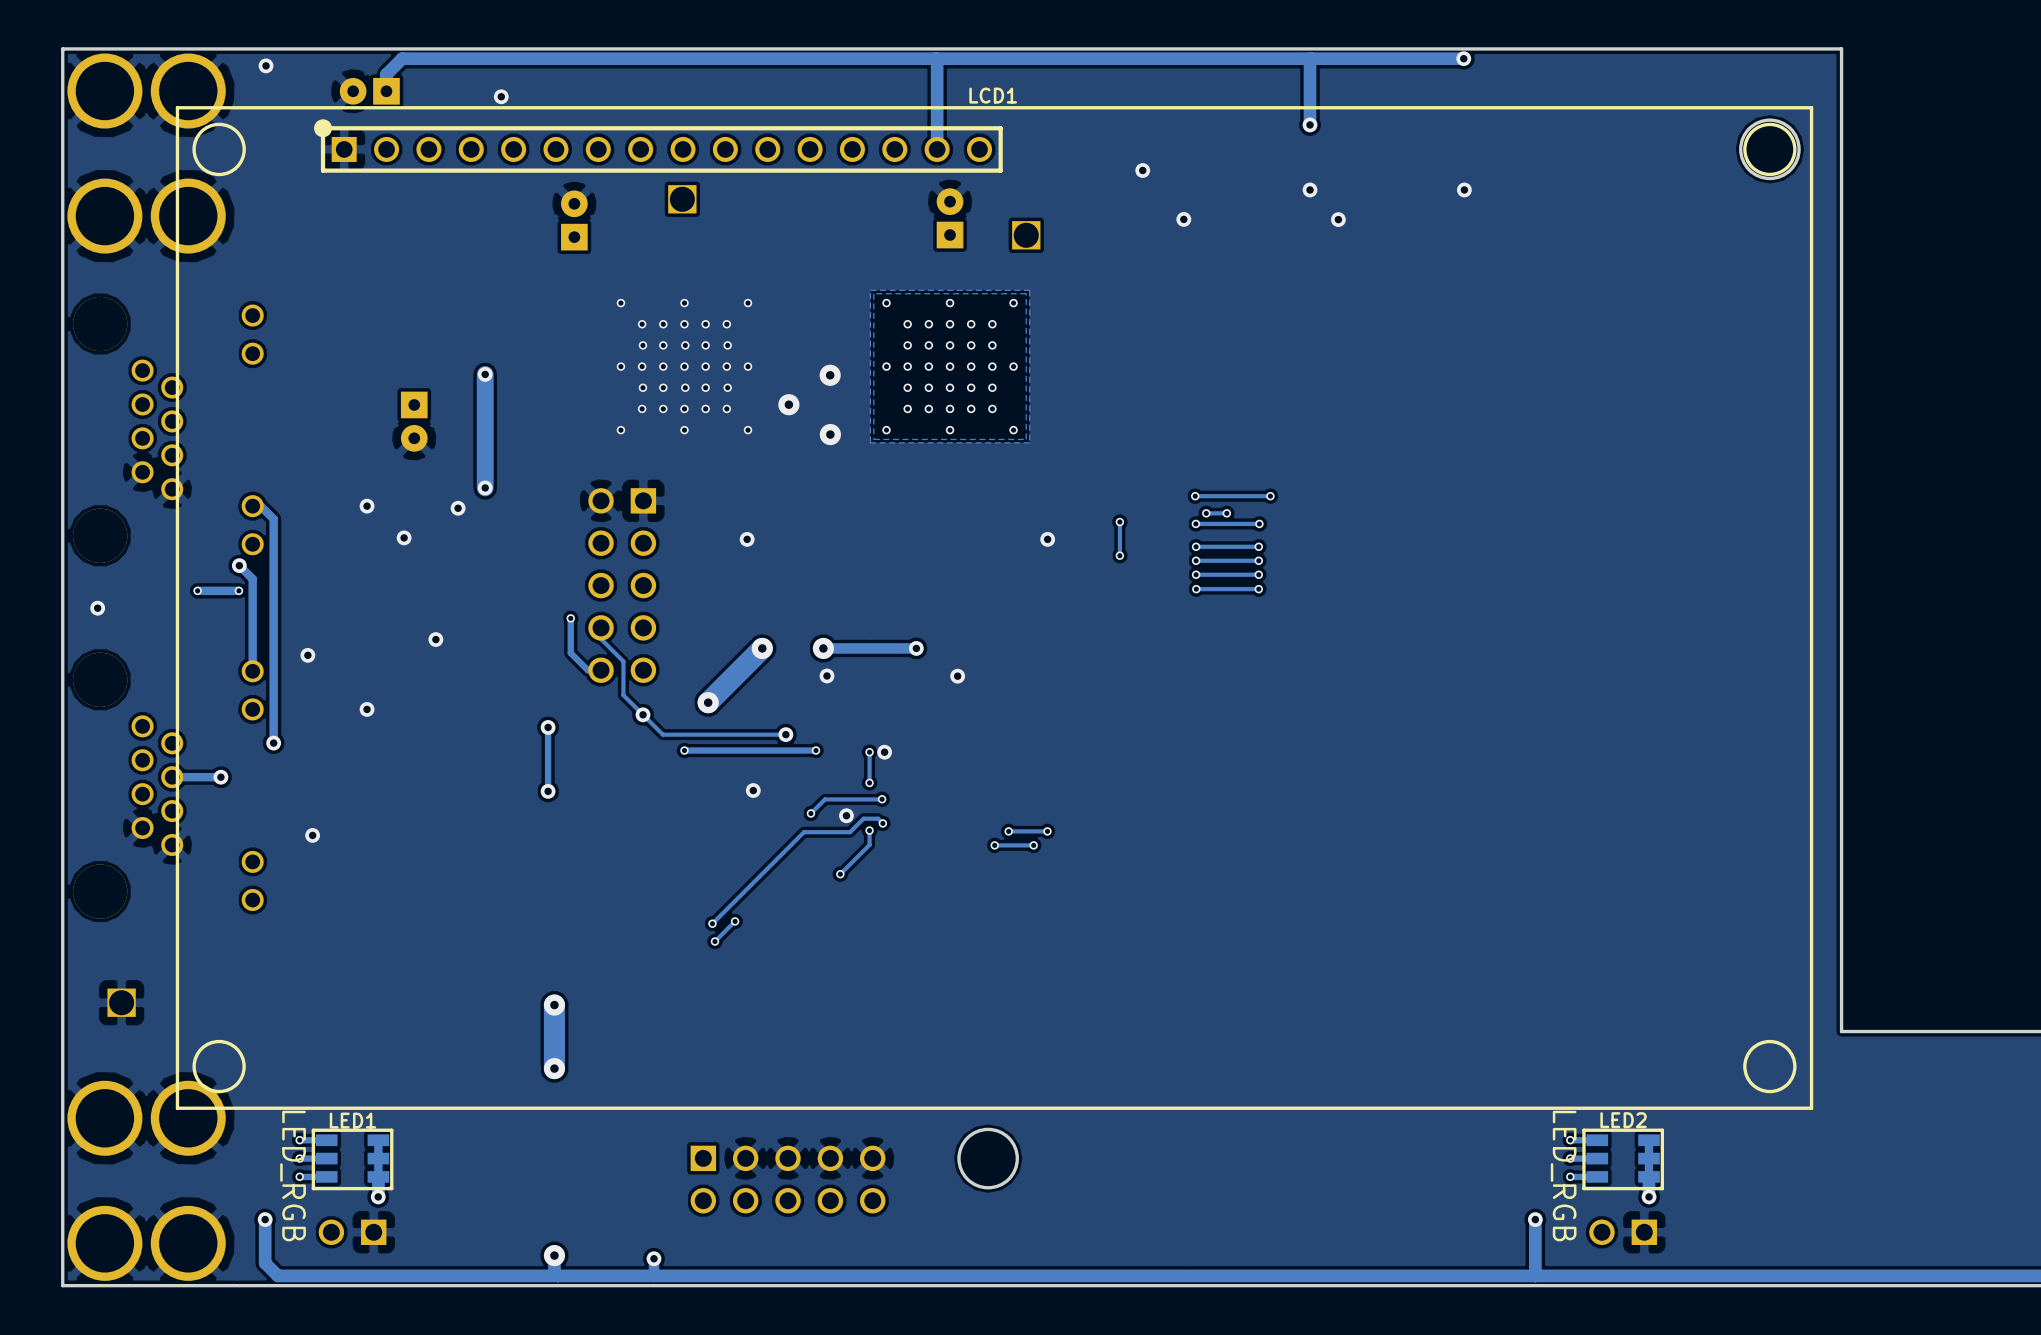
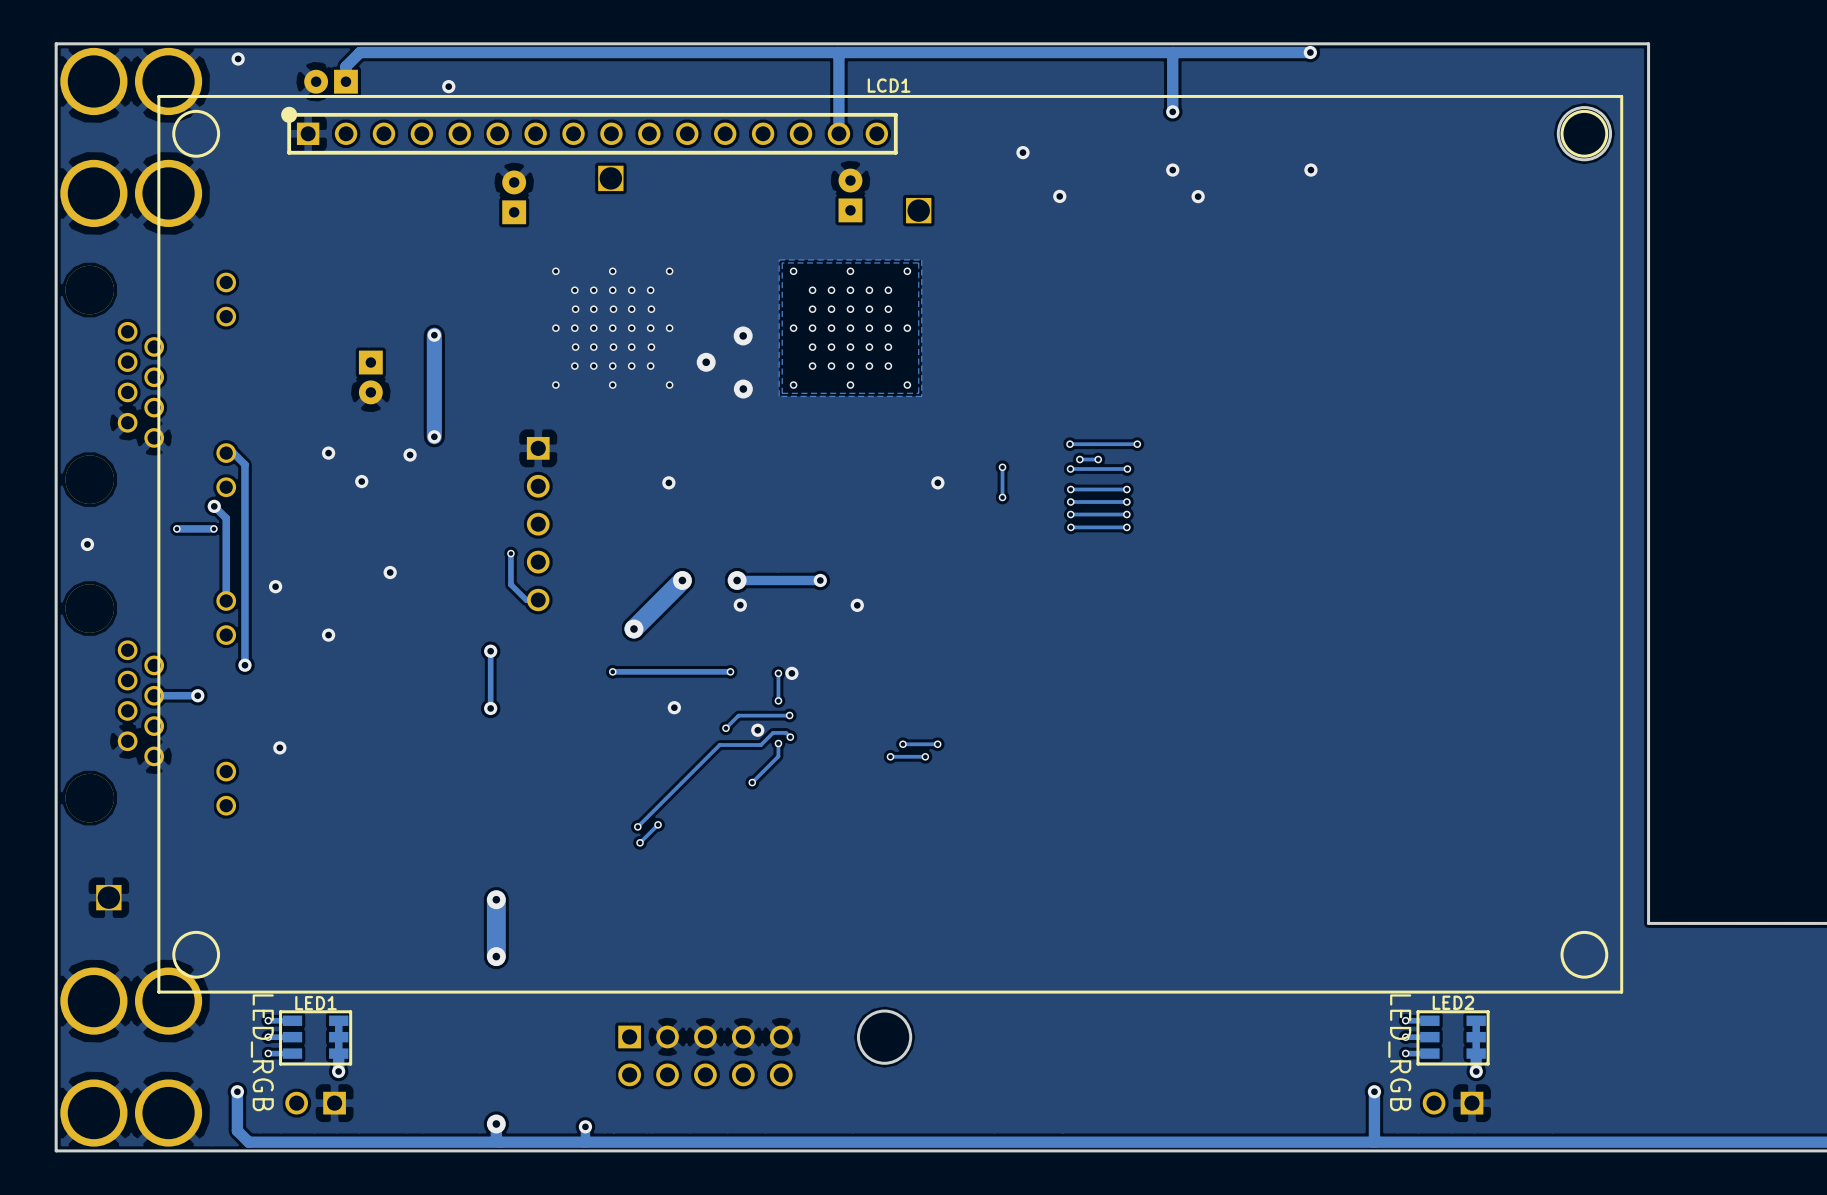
part: none -> (538, 524)
part: (622, 585) -> none
track: (601, 627) (601, 639) (623, 661) (623, 695) (662, 734) (785, 734) -> none
via: (643, 714) -> none
via: (785, 734) -> none

